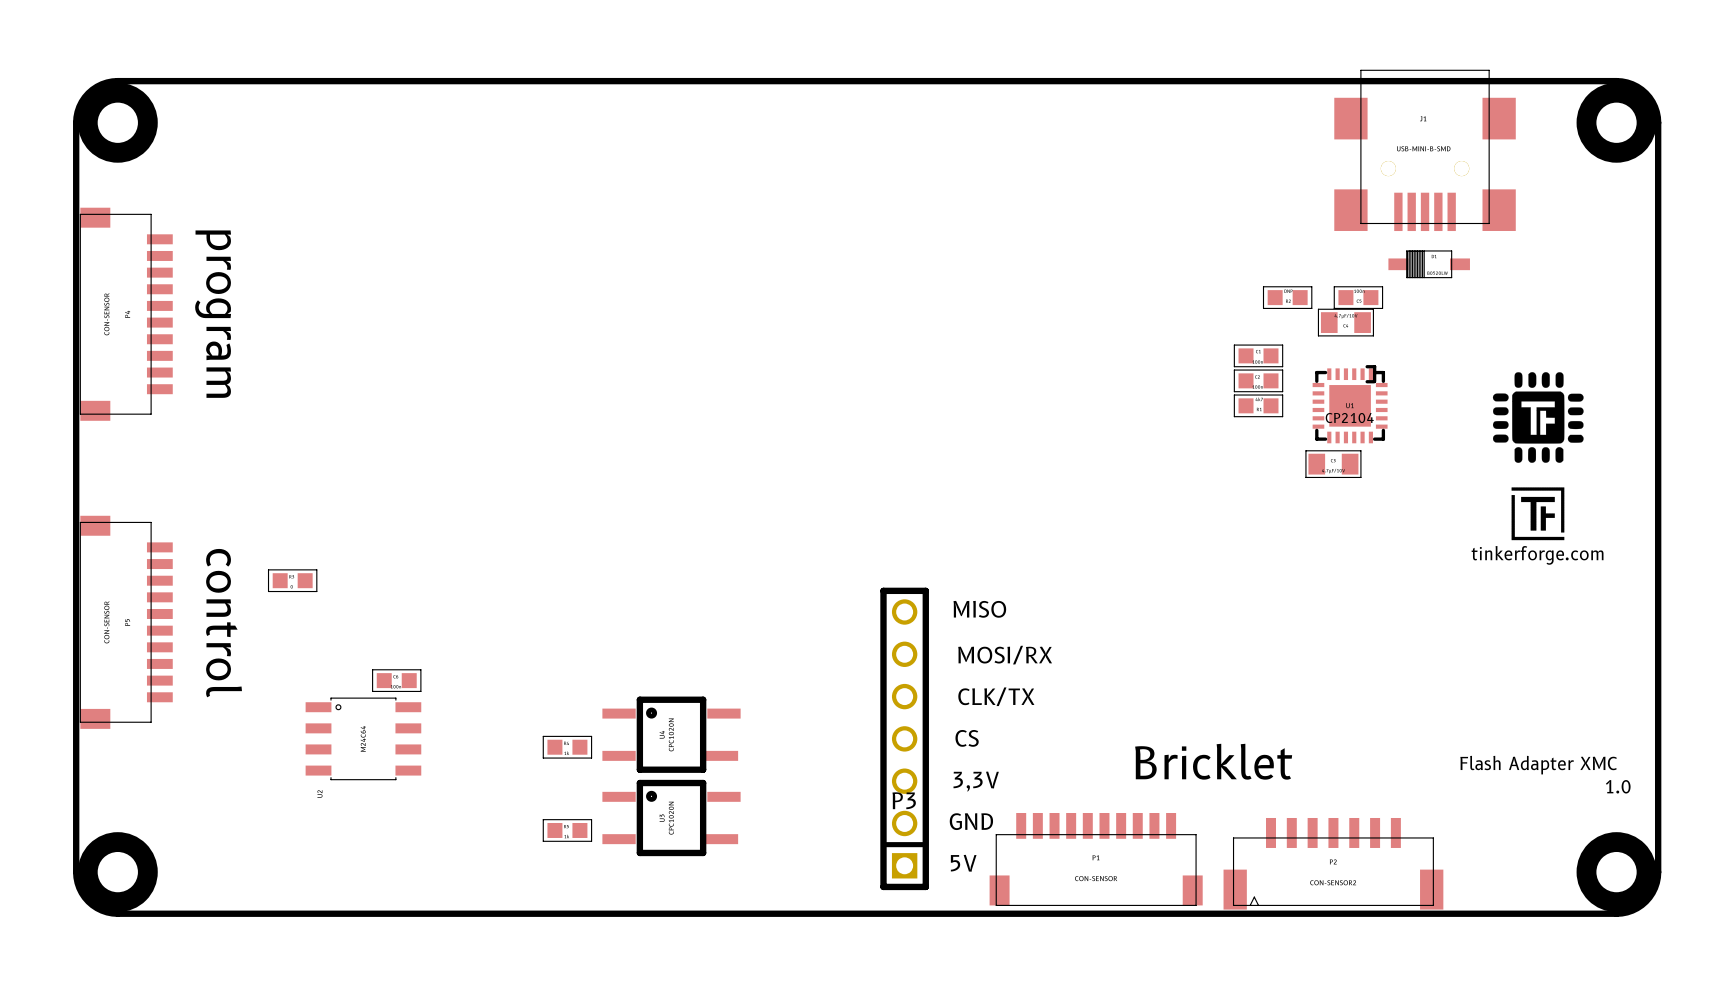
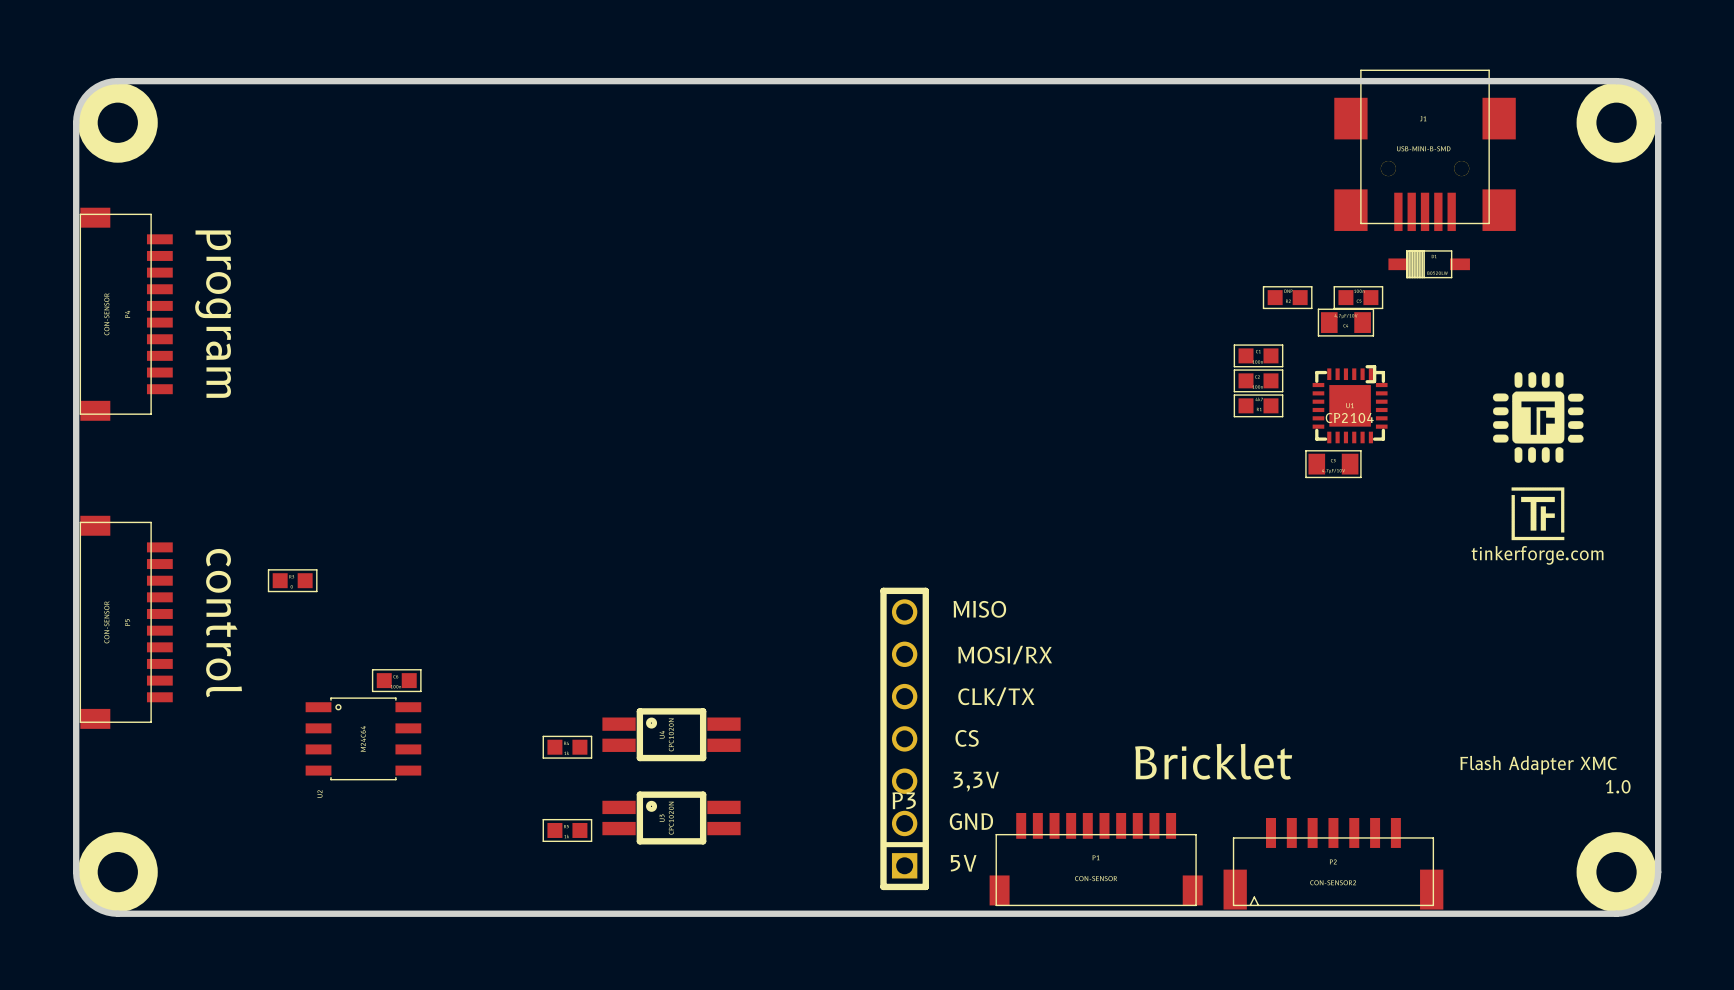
part footprint: [602, 696, 741, 773] -> [602, 708, 741, 762]
part footprint: [602, 779, 741, 857] -> [602, 791, 741, 845]

